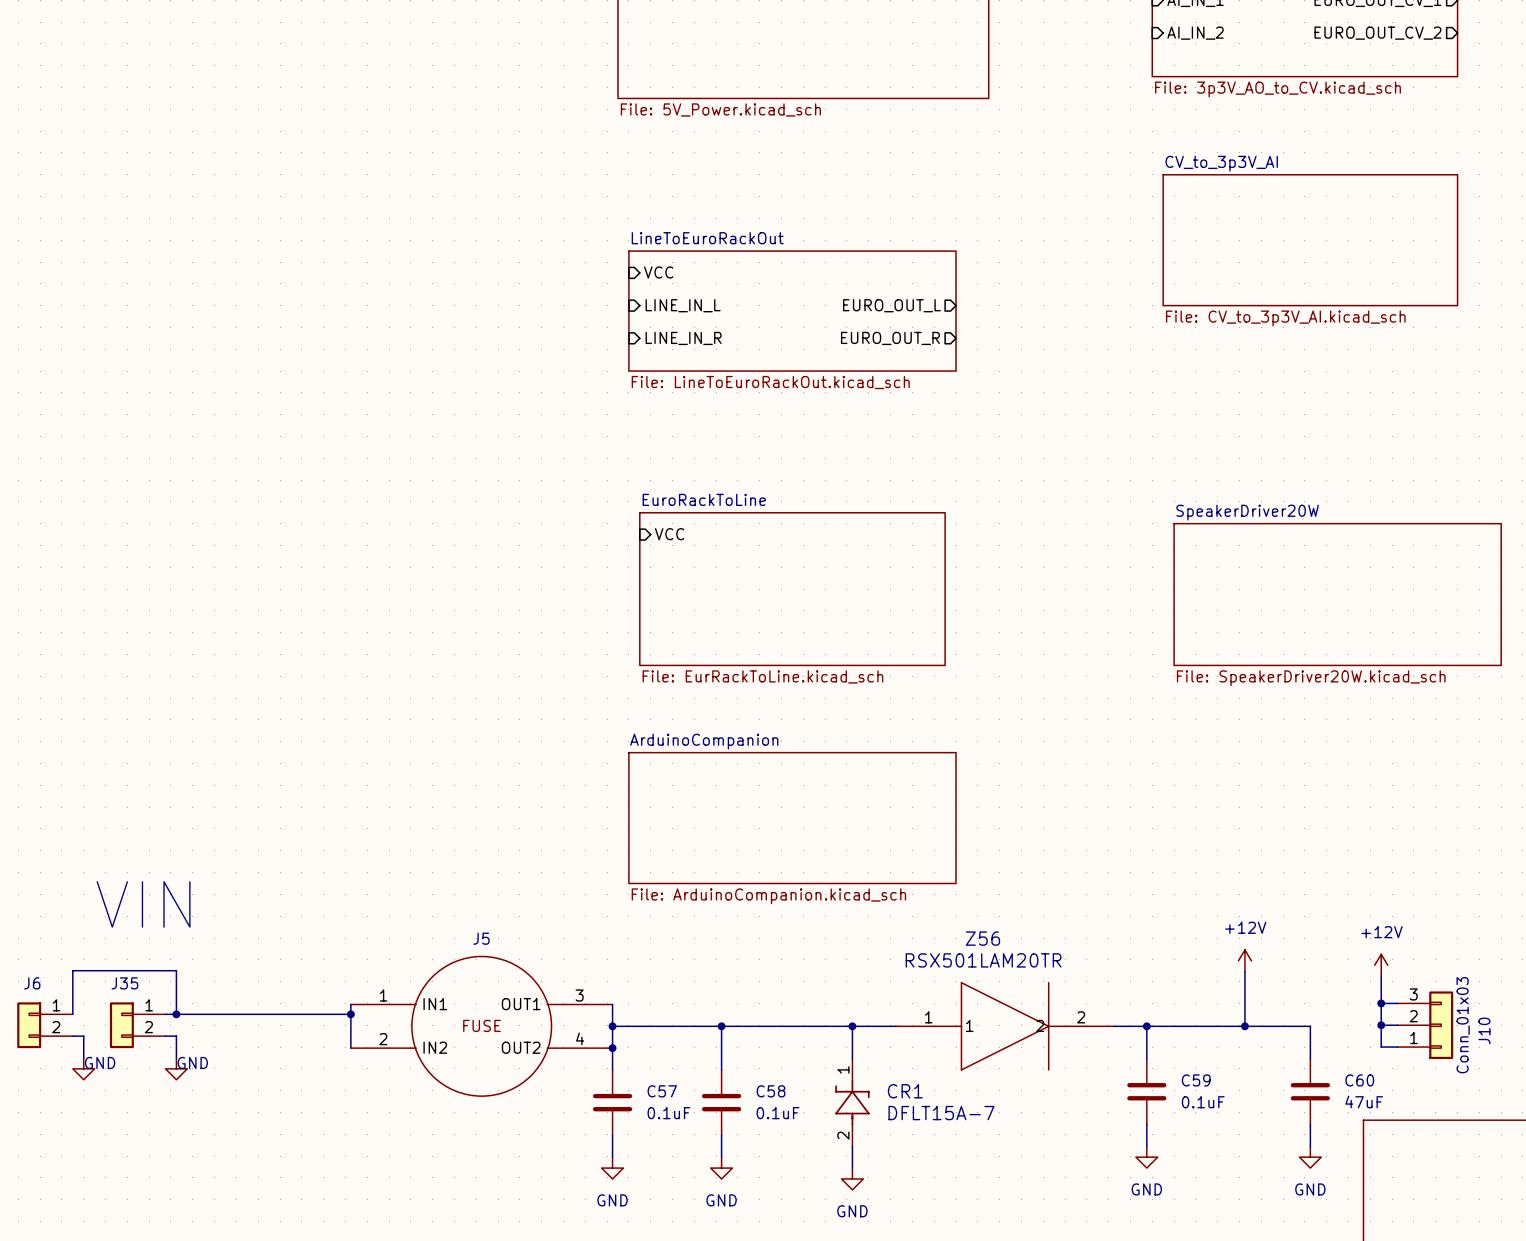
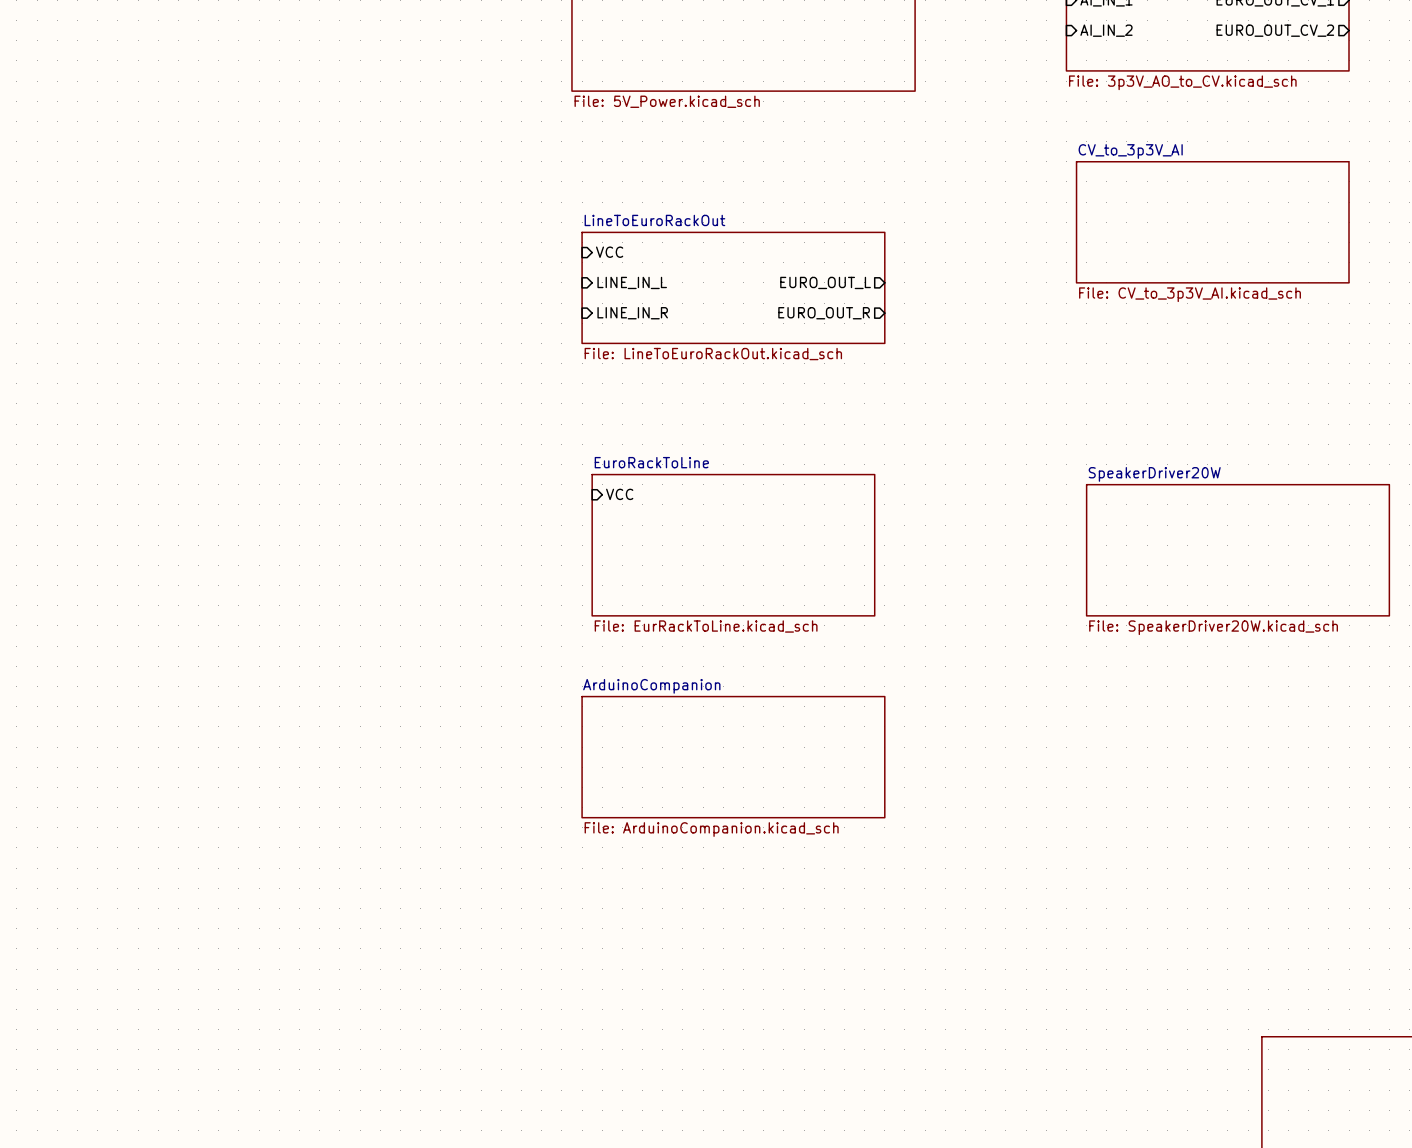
text: VIN (143, 904) -> none
power symbol: +12V (1244, 960) -> none
power symbol: +12V (1381, 965) -> none
wire: (1244, 971) (1244, 1026) -> none
wire: (1381, 976) (1381, 1047) (1397, 1047) -> none
wire: (1381, 1003) (1397, 1003) -> none
junction: (1381, 1003) -> none
wire: (350, 1004) (350, 1048) -> none
wire: (612, 1004) (612, 1069) -> none
wire: (72, 1014) (72, 970) (176, 970) (176, 1014) -> none
wire: (165, 1014) (350, 1014) -> none
junction: (176, 1014) -> none
junction: (350, 1014) -> none
J6: (45, 1025) -> none
J35: (137, 1025) -> none
wire: (1381, 1025) (1397, 1025) -> none
junction: (1381, 1025) -> none
J10: Conn_01x03 (1425, 1025) -> none
J5: (481, 1026) -> none
wire: (612, 1026) (896, 1026) -> none
junction: (612, 1026) -> none
wire: (721, 1026) (721, 1069) -> none
junction: (721, 1026) -> none
wire: (852, 1026) (852, 1059) -> none
junction: (852, 1026) -> none
Z56: RSX501LAM20TR (1005, 1026) -> none
wire: (1114, 1026) (1310, 1026) (1310, 1059) -> none
wire: (1146, 1026) (1146, 1059) -> none
junction: (1146, 1026) -> none
junction: (1244, 1026) -> none
wire: (72, 1036) (83, 1036) (83, 1057) -> none
wire: (165, 1036) (176, 1036) (176, 1057) -> none
junction: (612, 1048) -> none
power symbol: GND (83, 1068) -> none
power symbol: GND (176, 1068) -> none
C59: 0.1uF (1146, 1091) -> none
C60: 47uF (1310, 1091) -> none
C57: 0.1uF (612, 1102) -> none
C58: 0.1uF (721, 1102) -> none
CR1: DFLT15A-7 (852, 1102) -> none
wire: (1146, 1124) (1146, 1146) -> none
wire: (1310, 1124) (1310, 1146) -> none
wire: (612, 1135) (612, 1157) -> none
wire: (721, 1135) (721, 1157) -> none
wire: (852, 1146) (852, 1168) -> none
power symbol: GND (1146, 1157) -> none
power symbol: GND (1310, 1157) -> none
power symbol: GND (612, 1168) -> none
power symbol: GND (721, 1168) -> none
power symbol: GND (852, 1178) -> none

